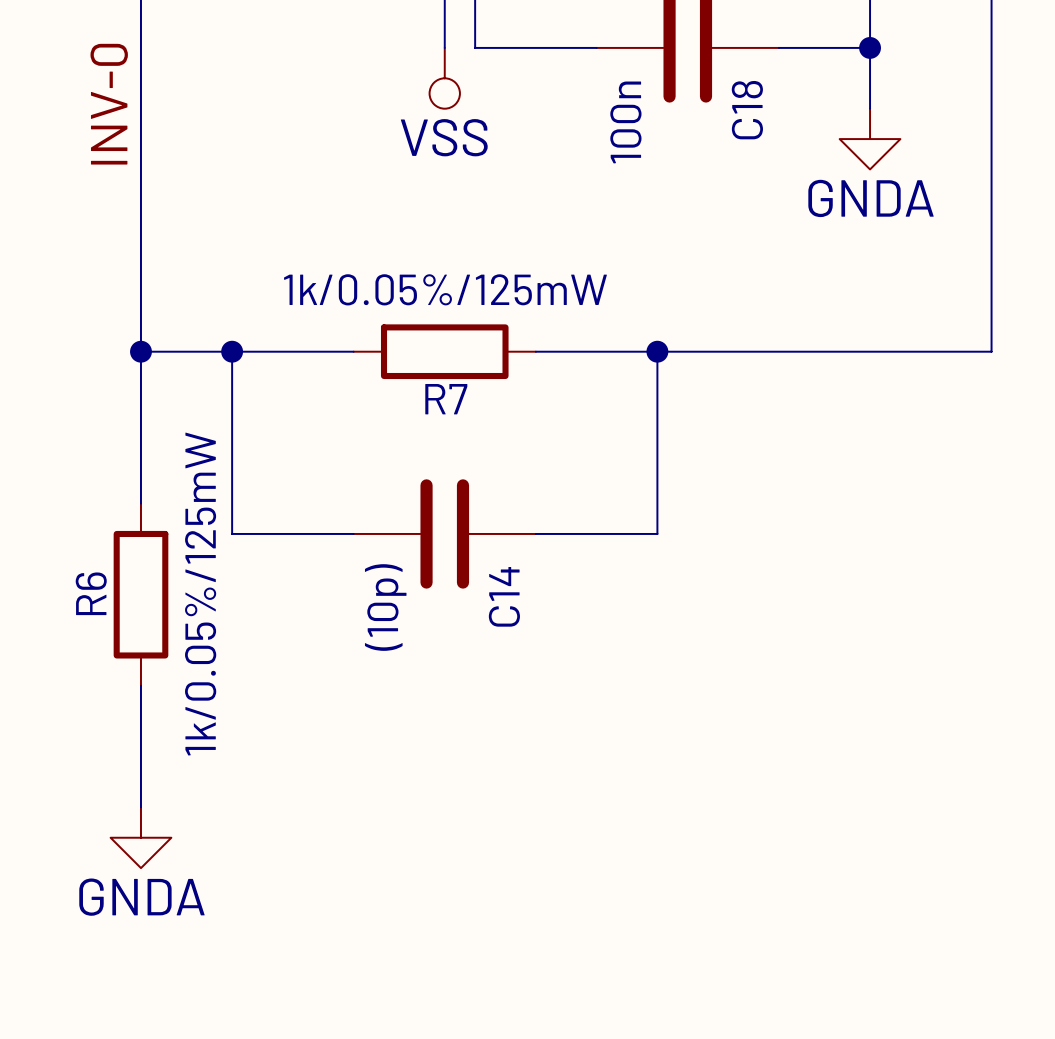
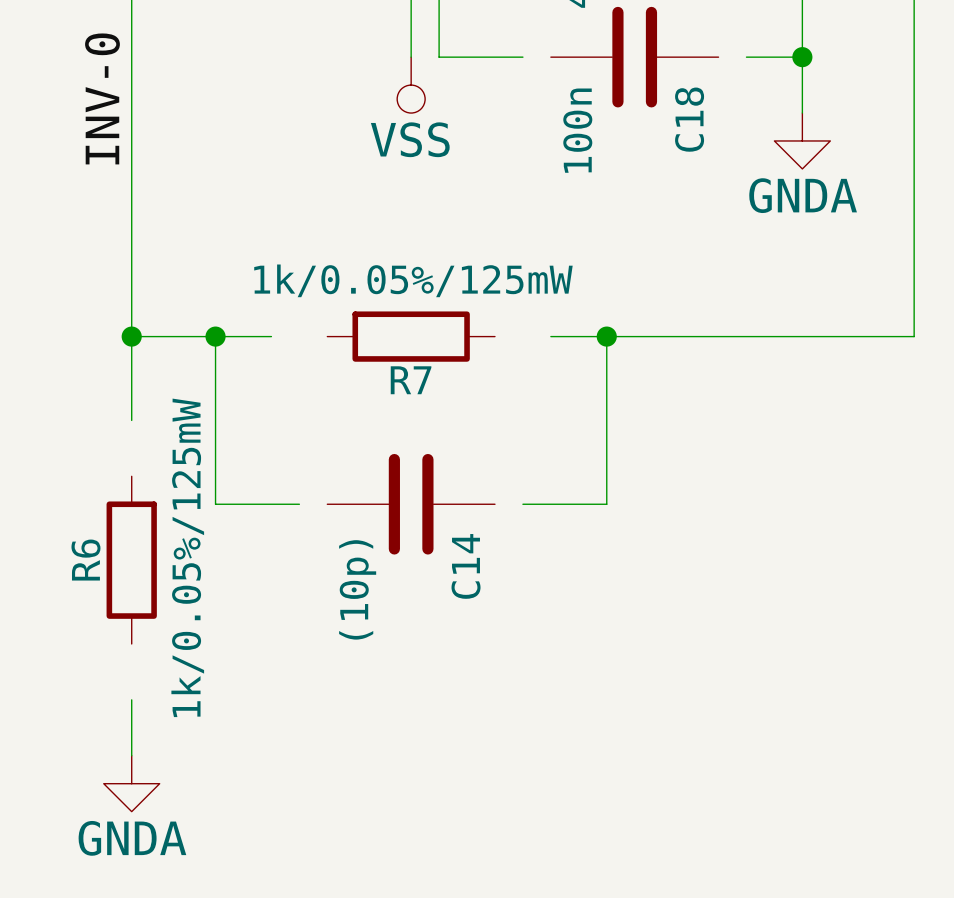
wire: (566, 47) (596, 47) -> none
wire: (778, 47) (809, 47) -> none
wire: (292, 351) (353, 351) -> none
wire: (535, 351) (596, 351) -> none
wire: (140, 442) (140, 503) -> none
wire: (323, 533) (353, 533) -> none
wire: (535, 533) (566, 533) -> none
wire: (140, 685) (140, 746) -> none

